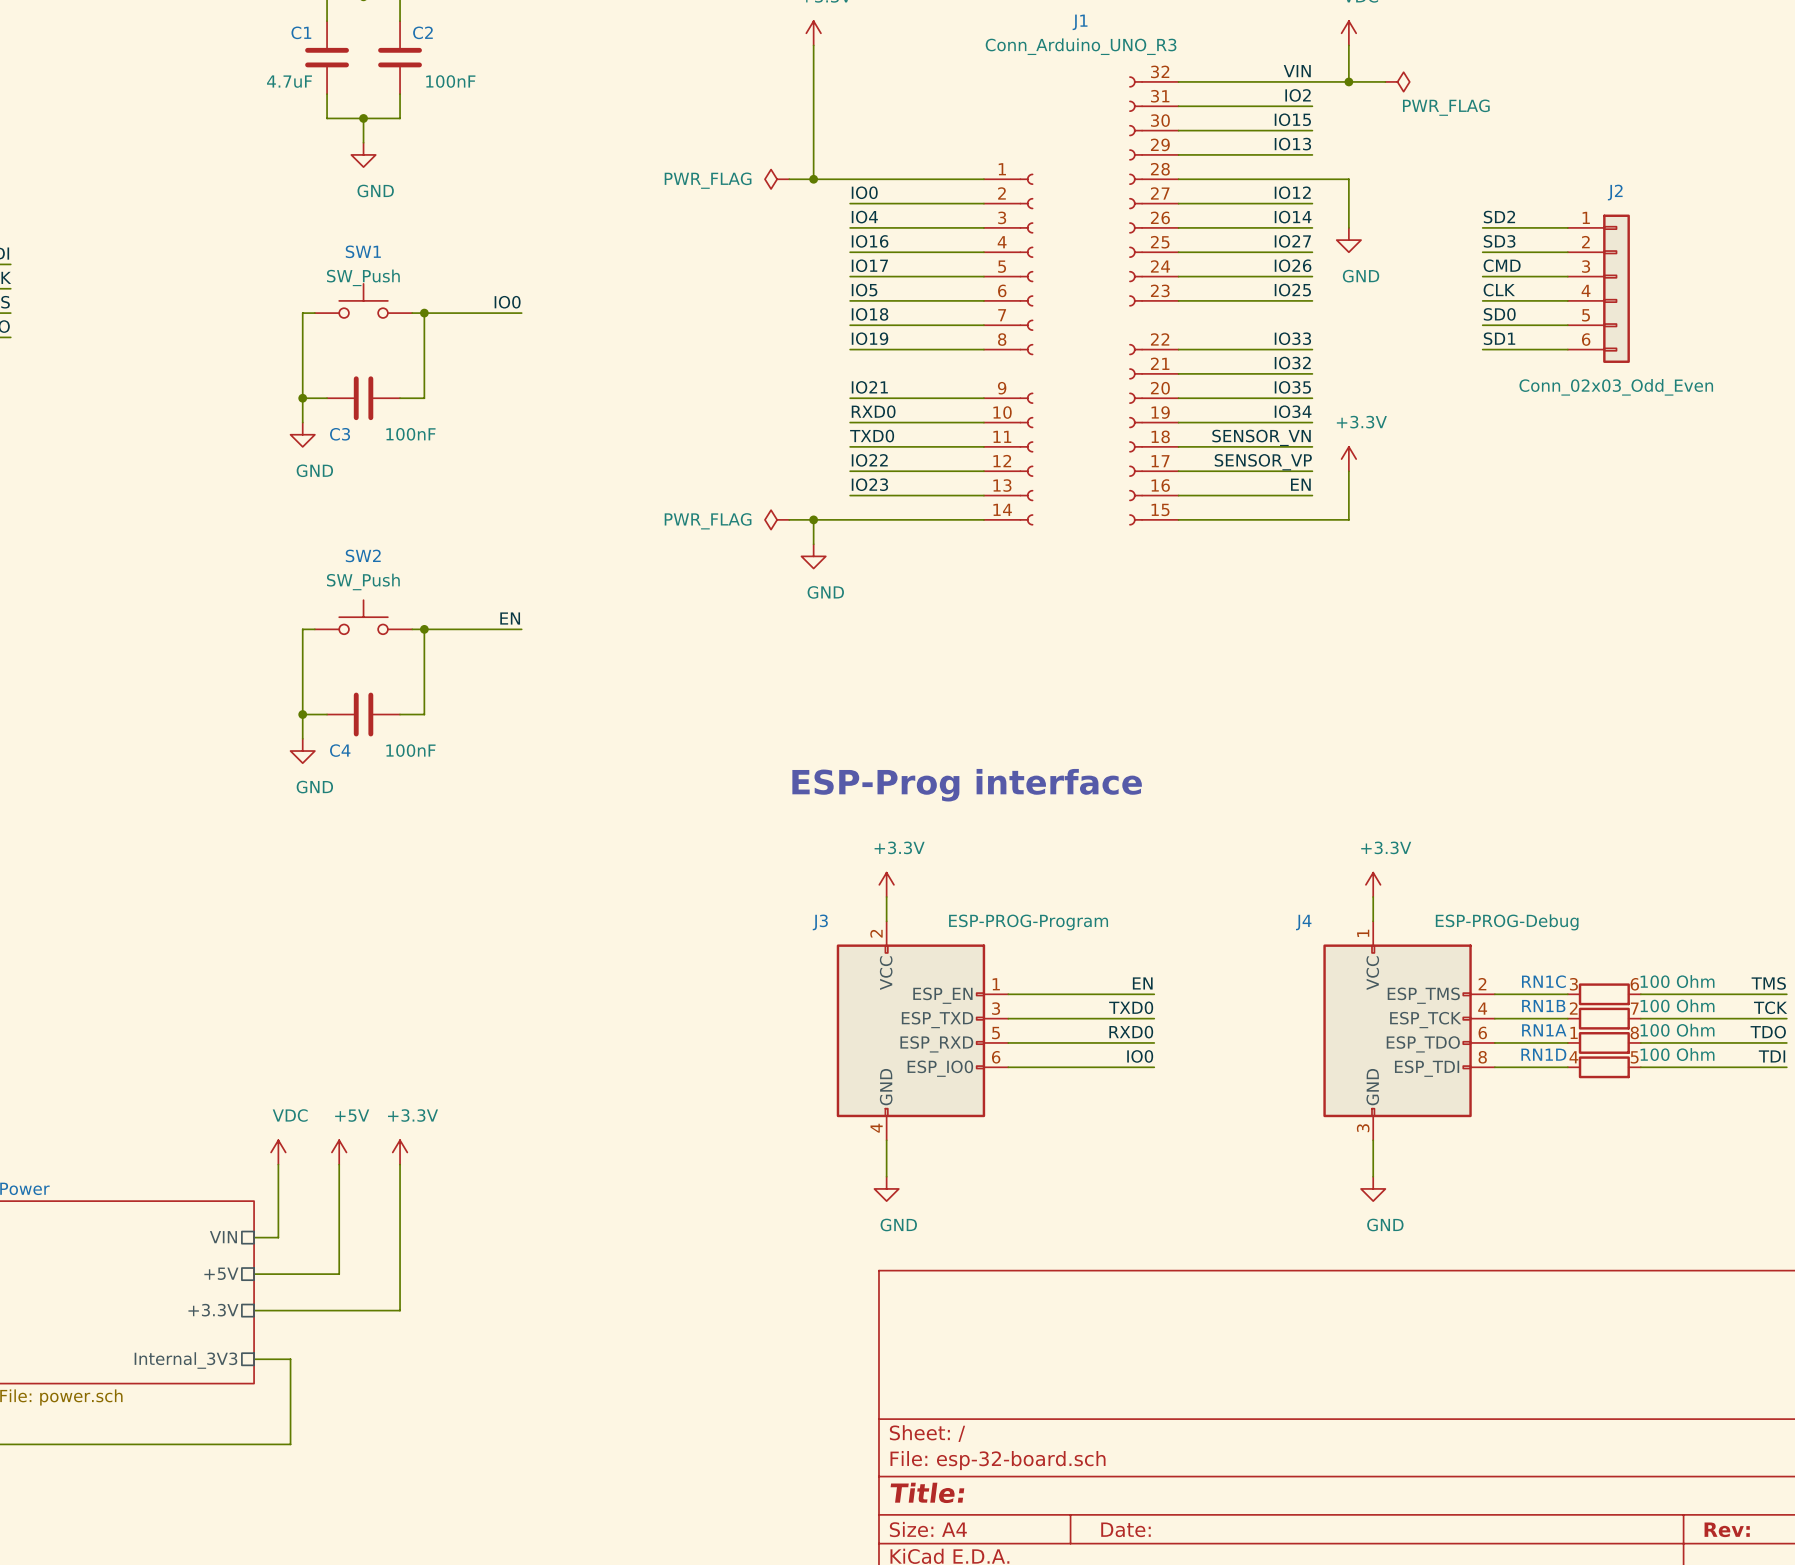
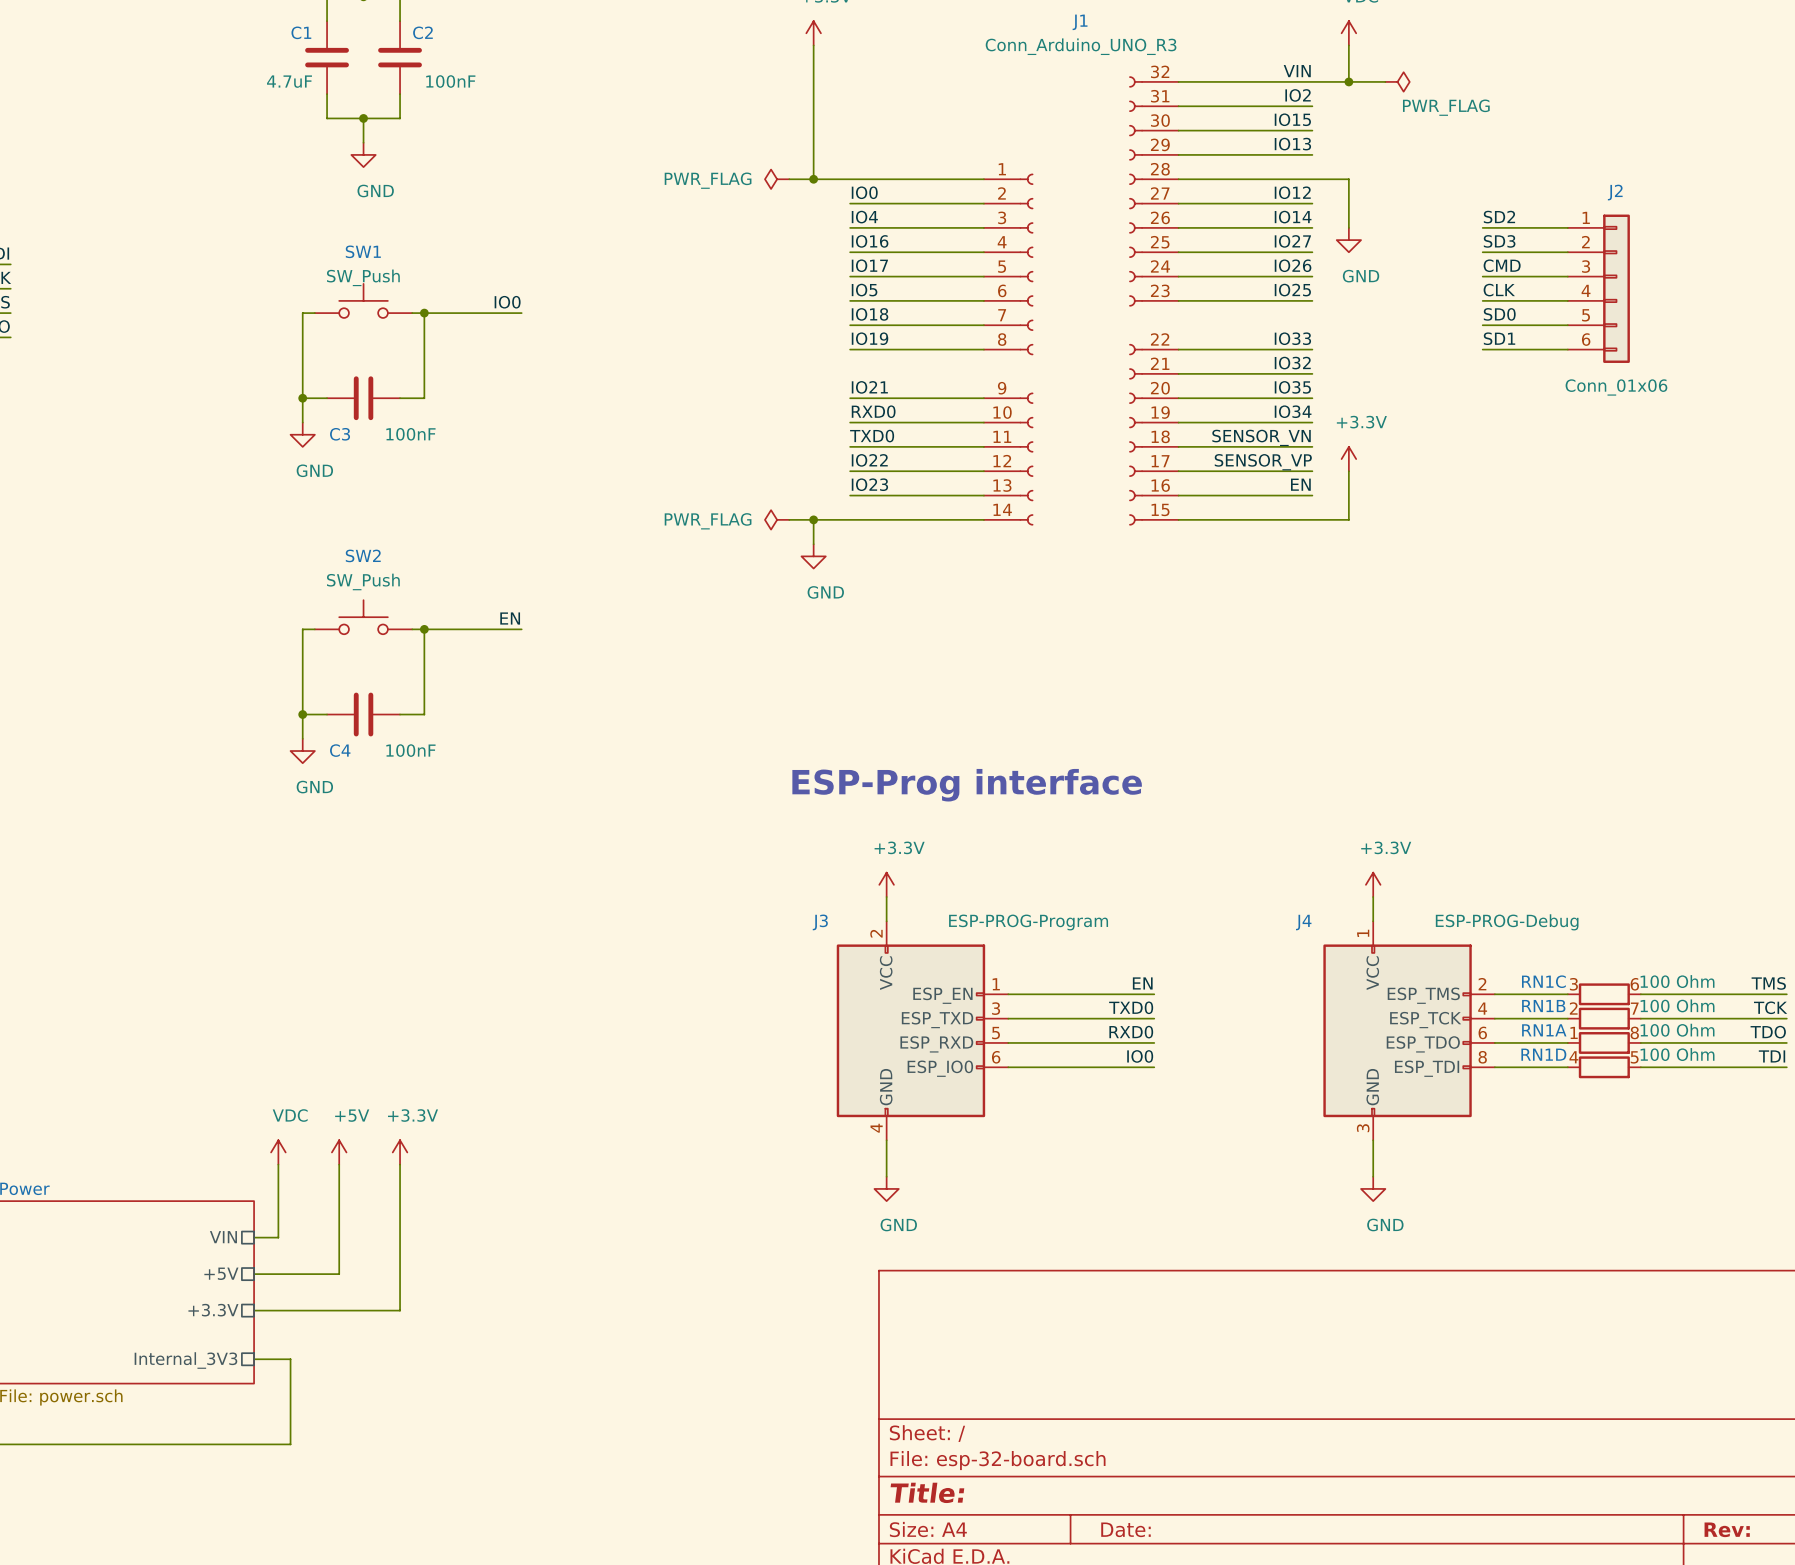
J2 value: Conn_02x03_Odd_Even (1616, 387) -> Conn_01x06 (1616, 387)

